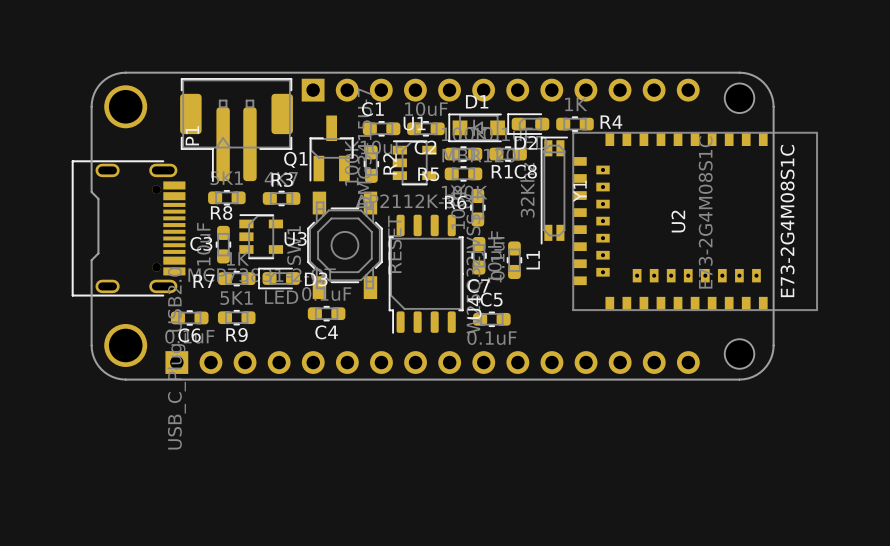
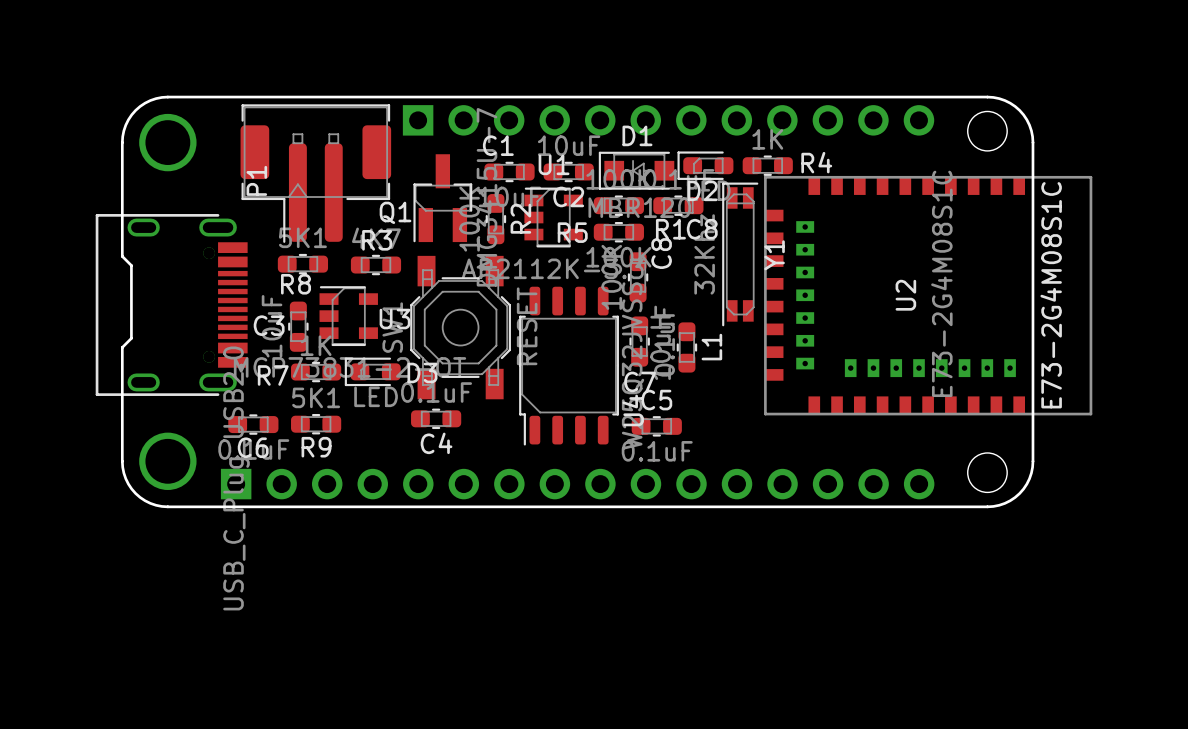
R6 name: R6 (455, 202) -> C8 (661, 253)

